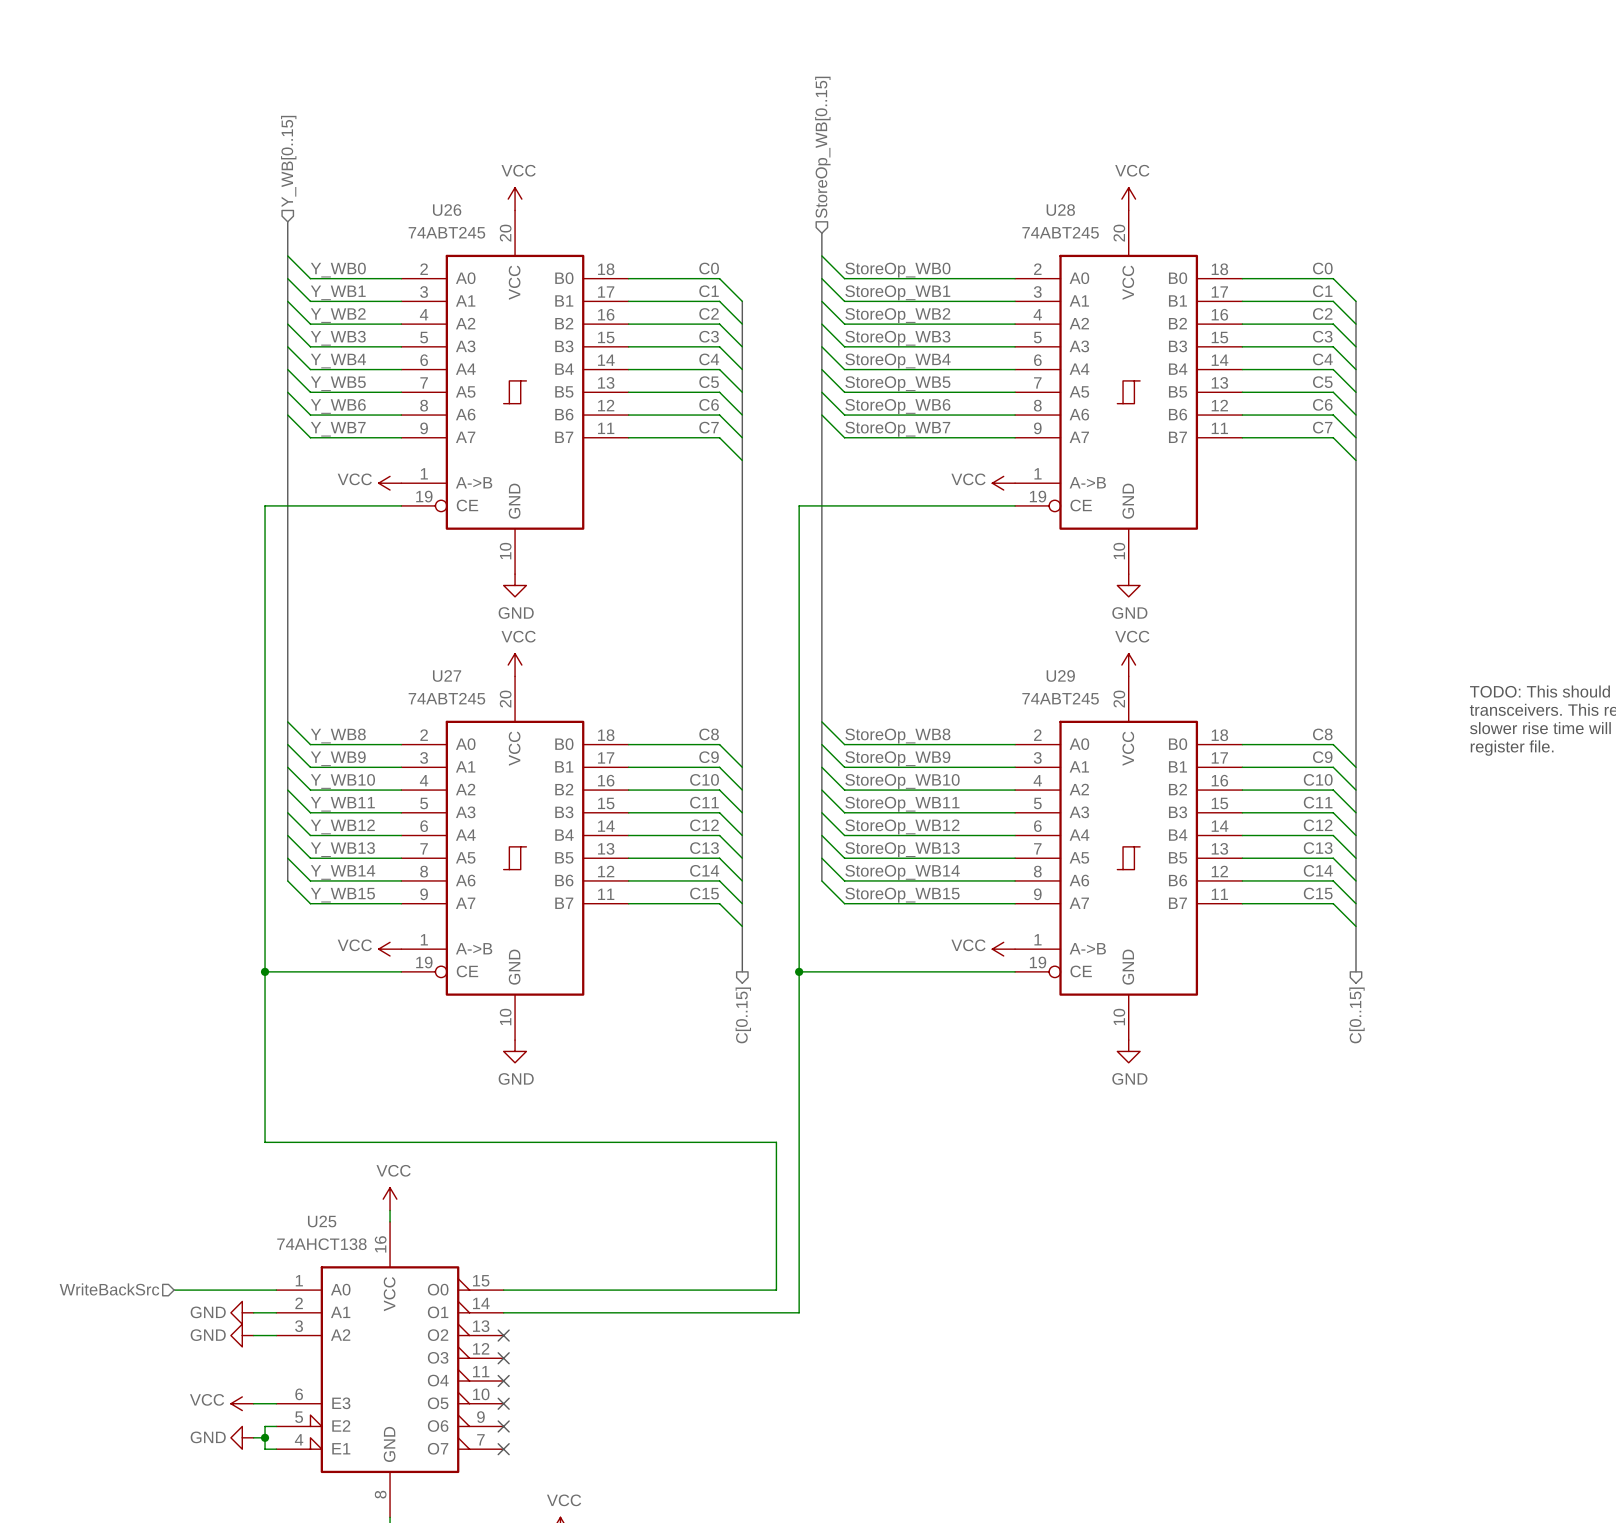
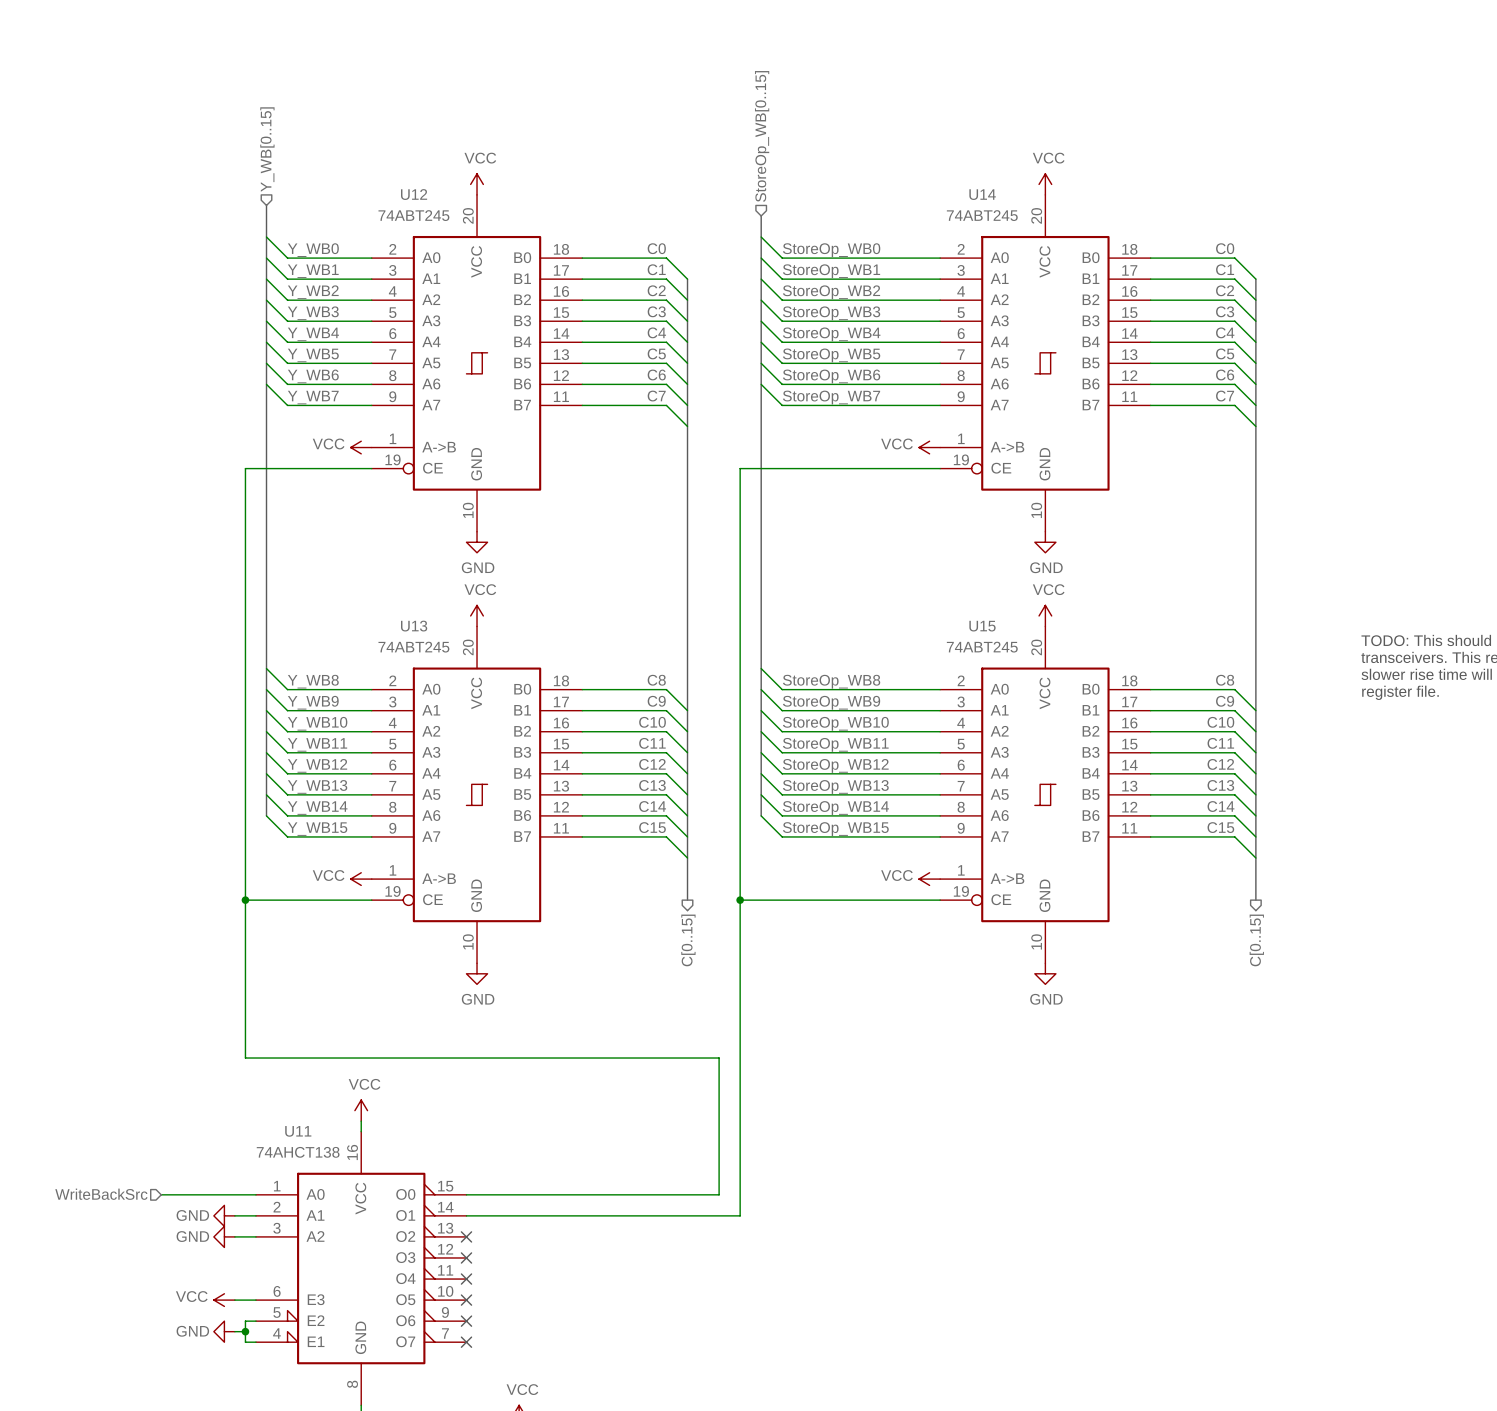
U26 name: U26 (447, 210) -> U12 (414, 194)
U28 name: U28 (1060, 210) -> U14 (982, 194)
U27 name: U27 (447, 675) -> U13 (414, 626)
U29 name: U29 (1060, 675) -> U15 (982, 626)
U25 name: U25 (322, 1221) -> U11 (298, 1131)

